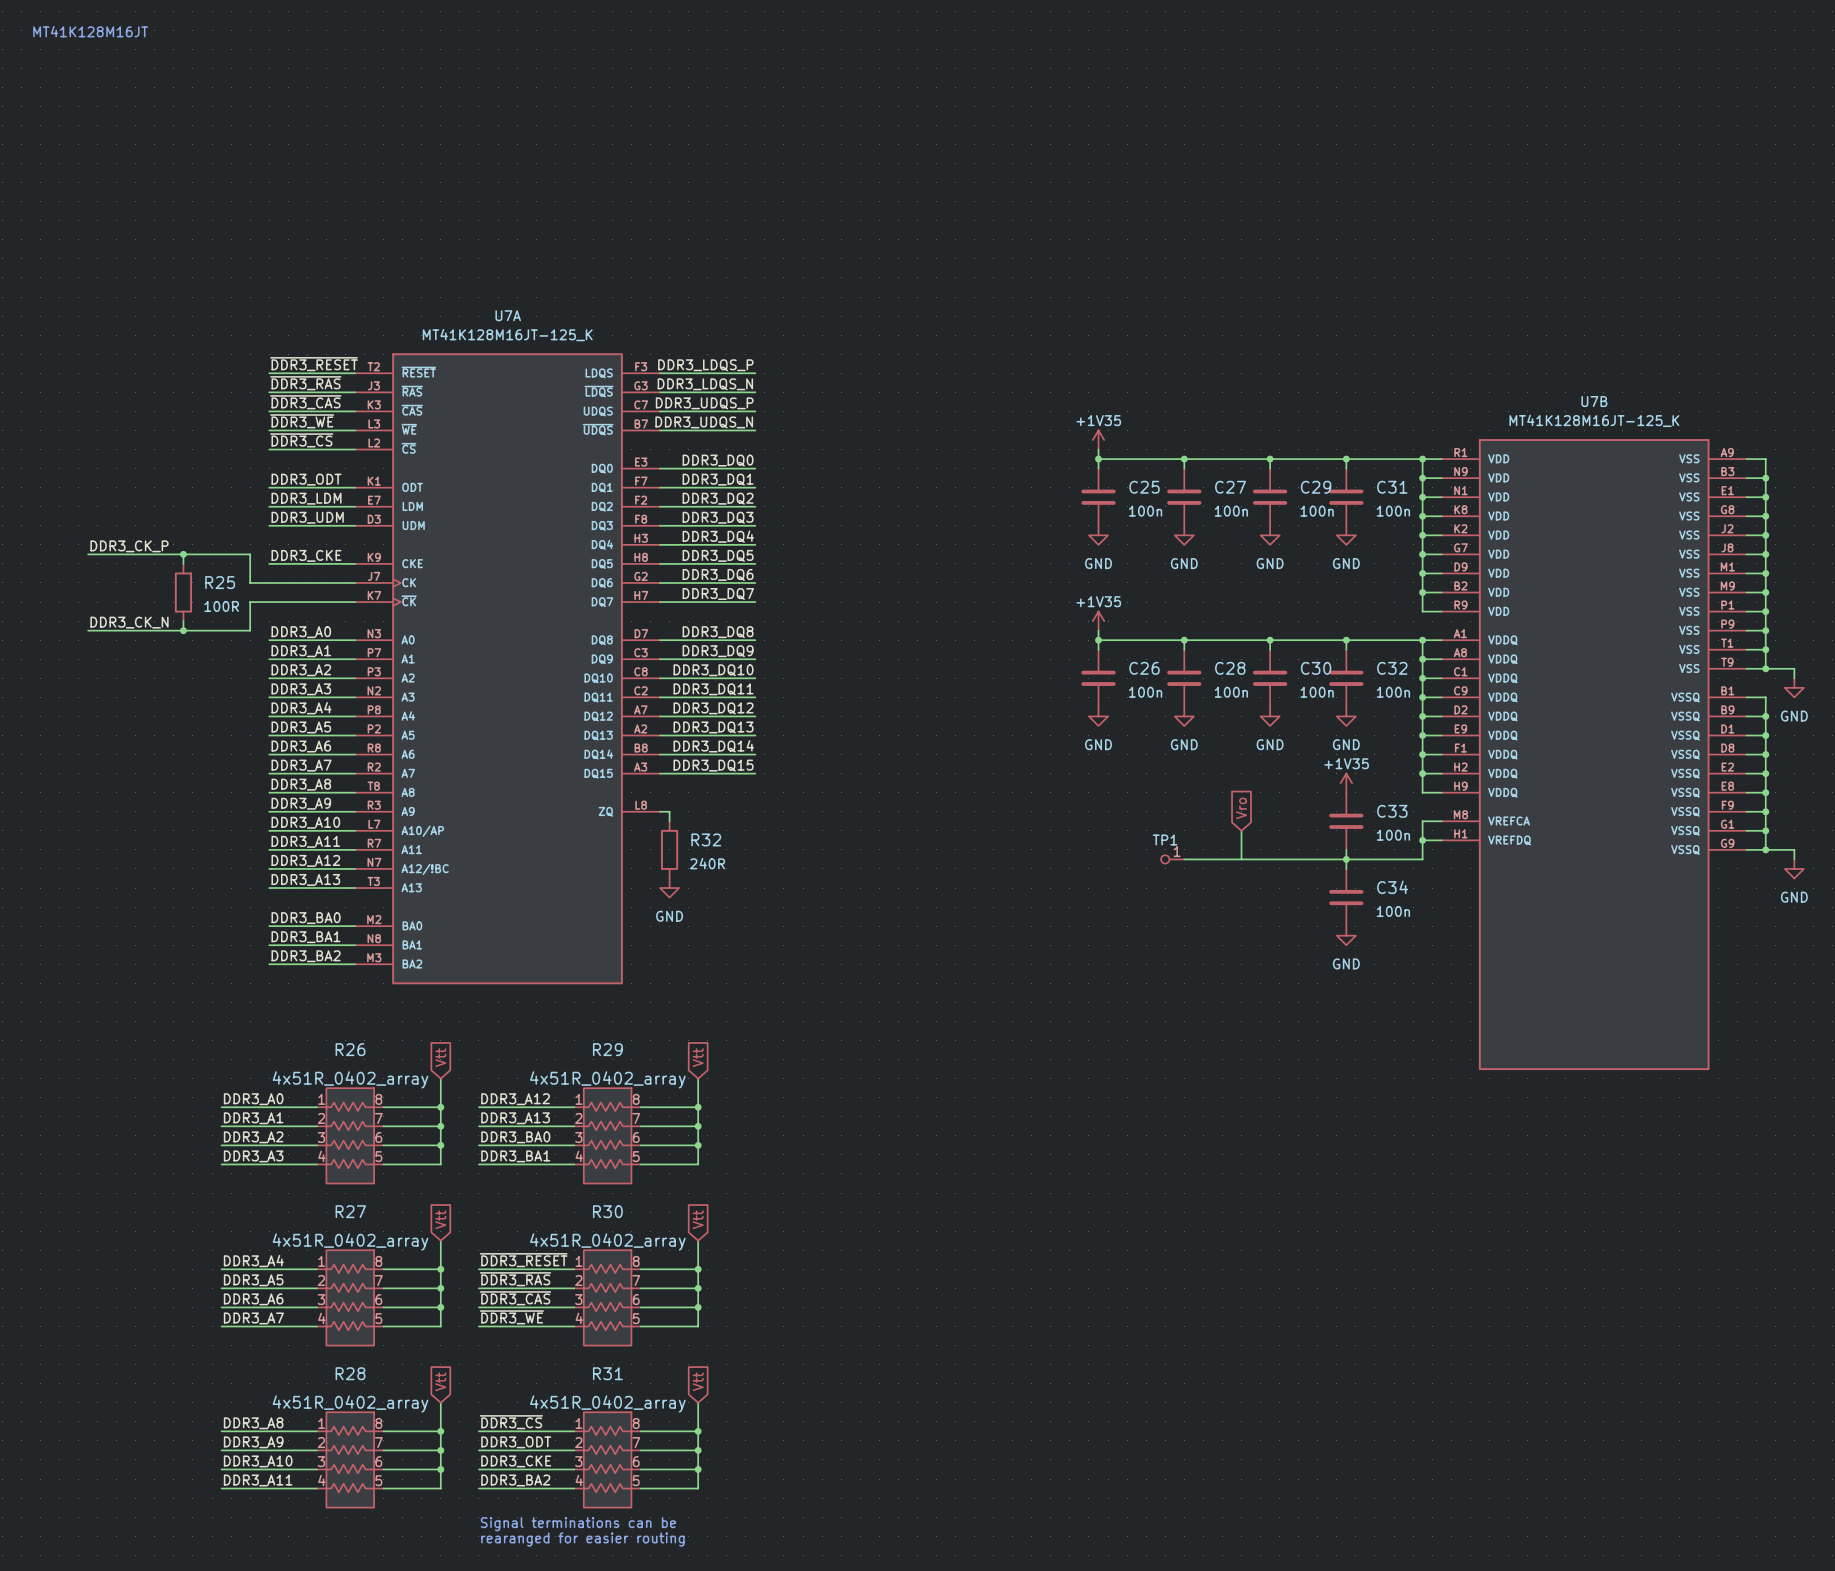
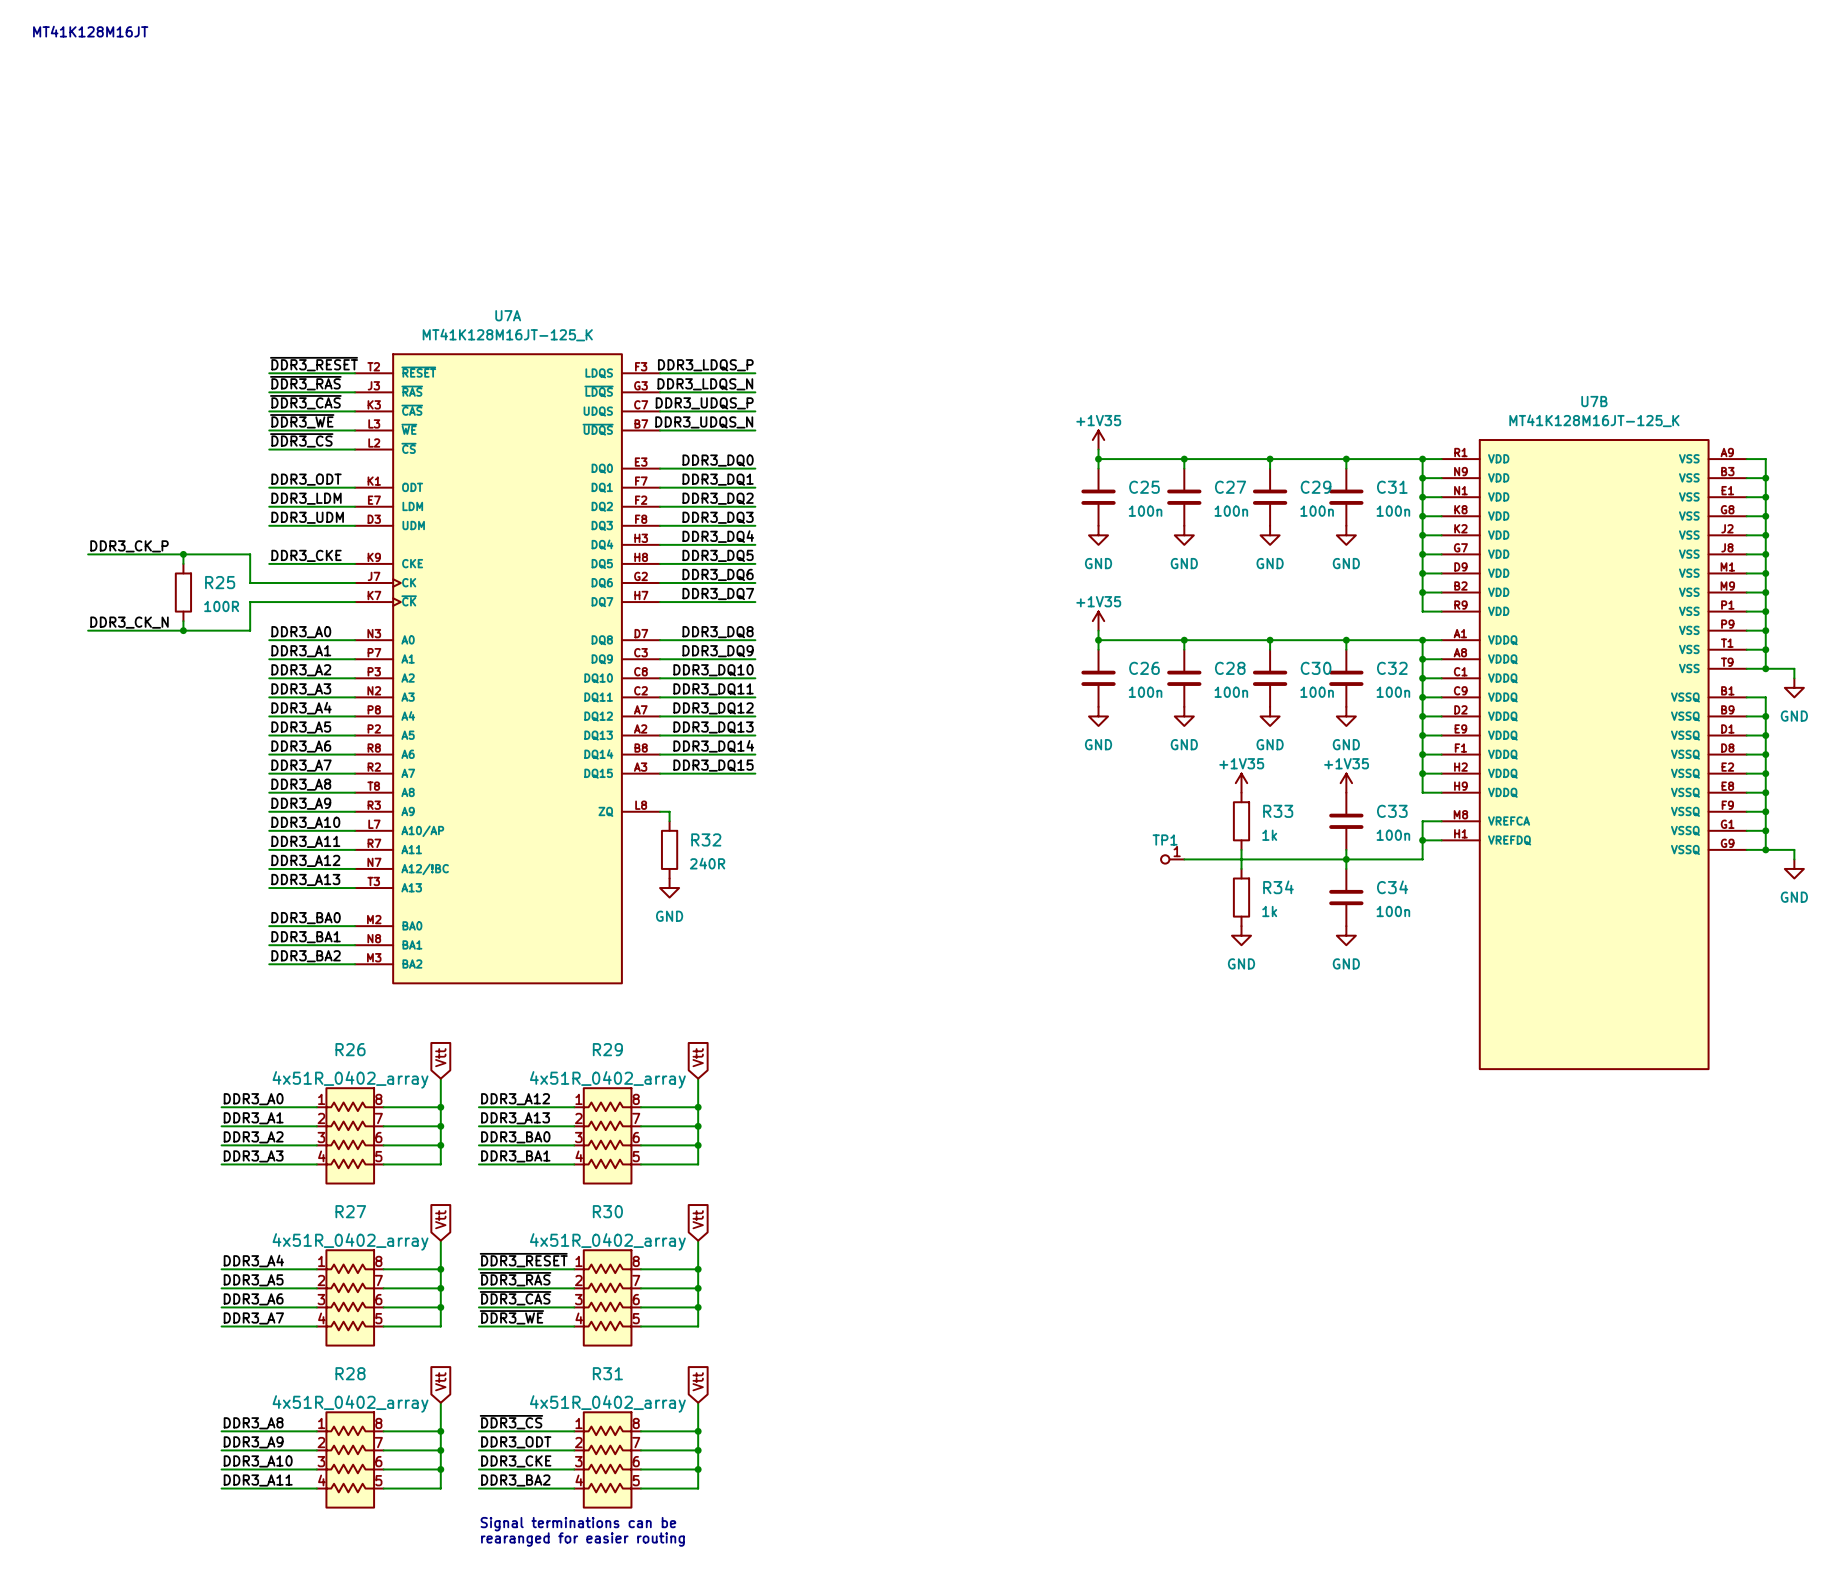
power symbol: none -> +1V35 (1241, 783)
global label: Vro (1241, 808) -> none
R33: none -> (1241, 821)
wire: none -> (1241, 859) (1241, 868)
R34: none -> (1241, 897)
power symbol: none -> GND (1241, 935)

